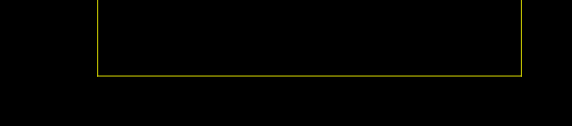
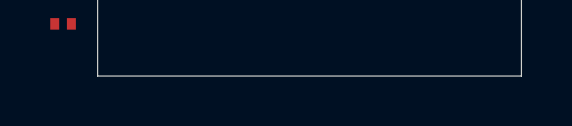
part: none -> (63, 23)

